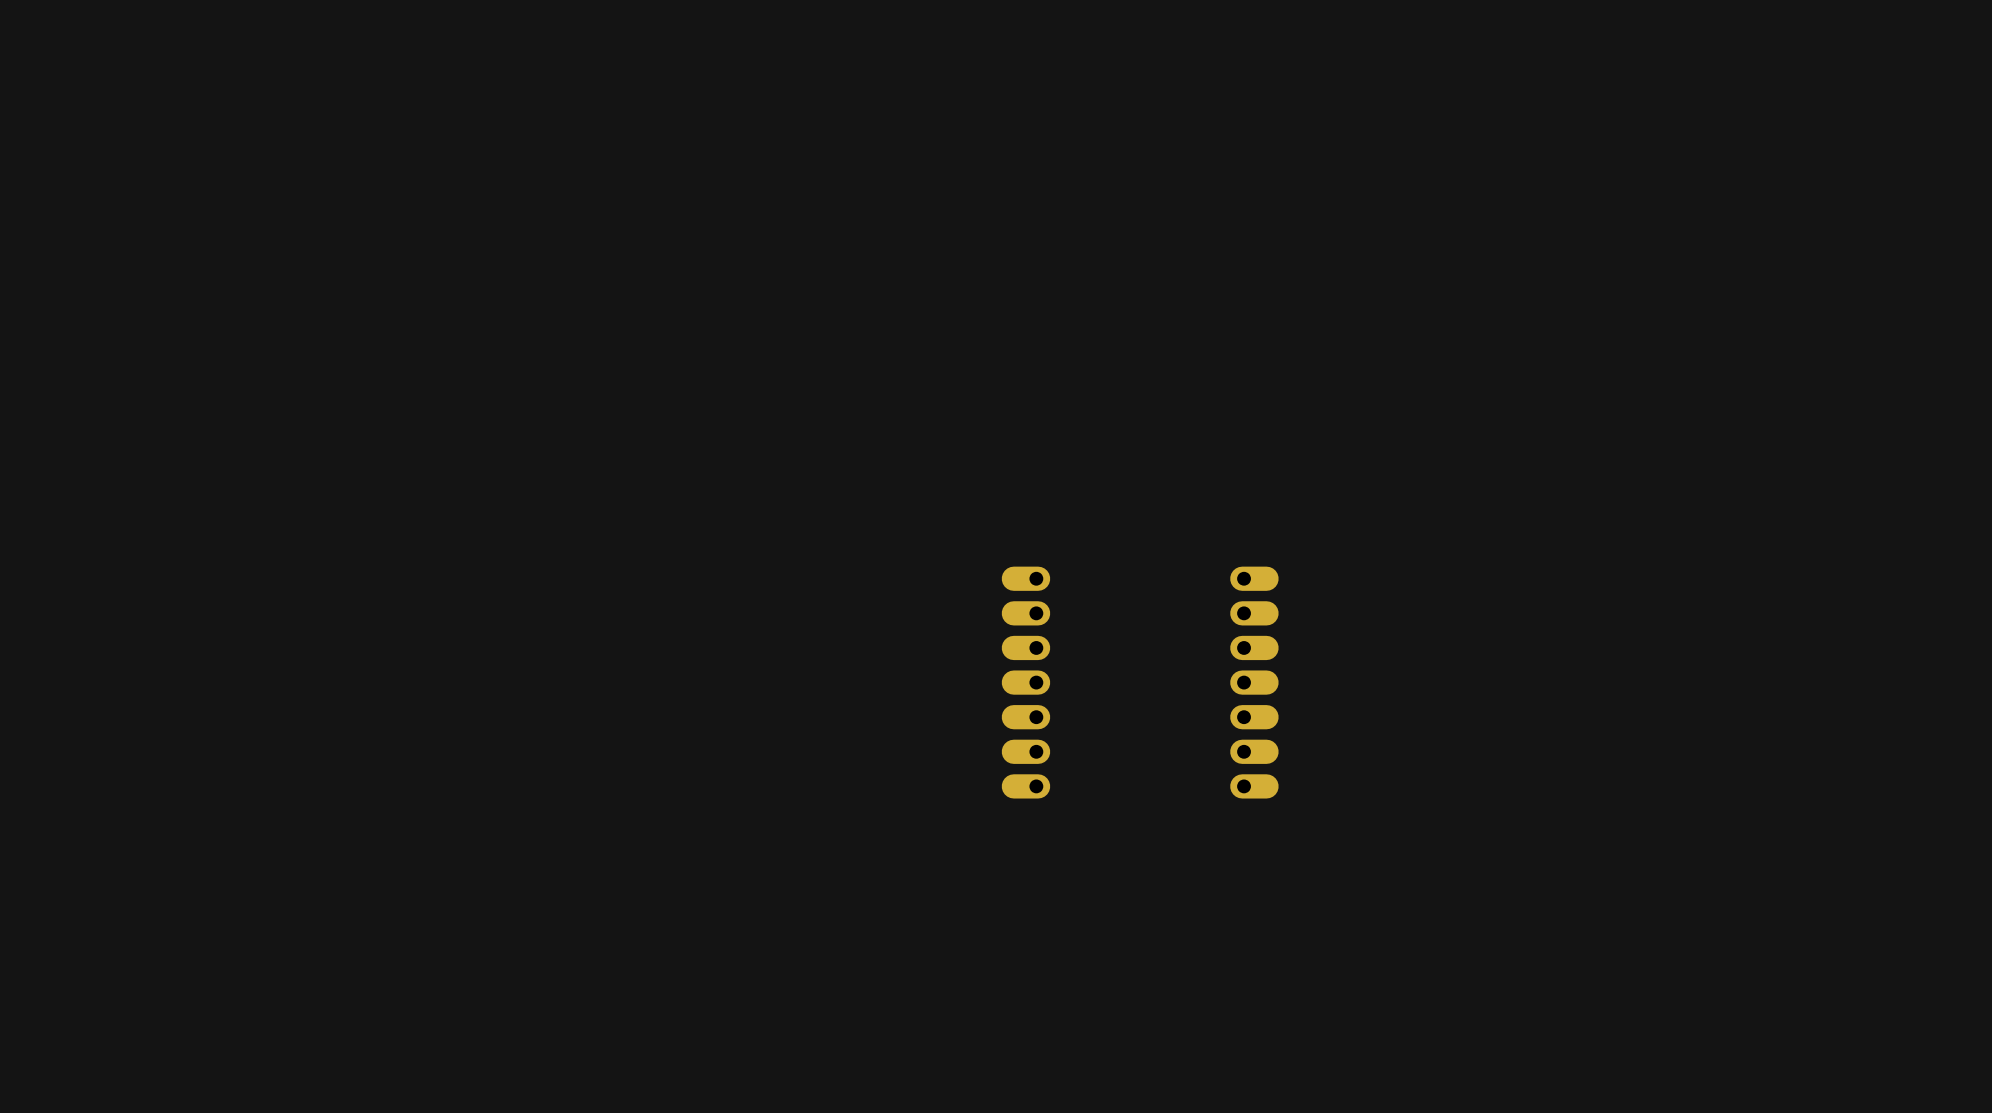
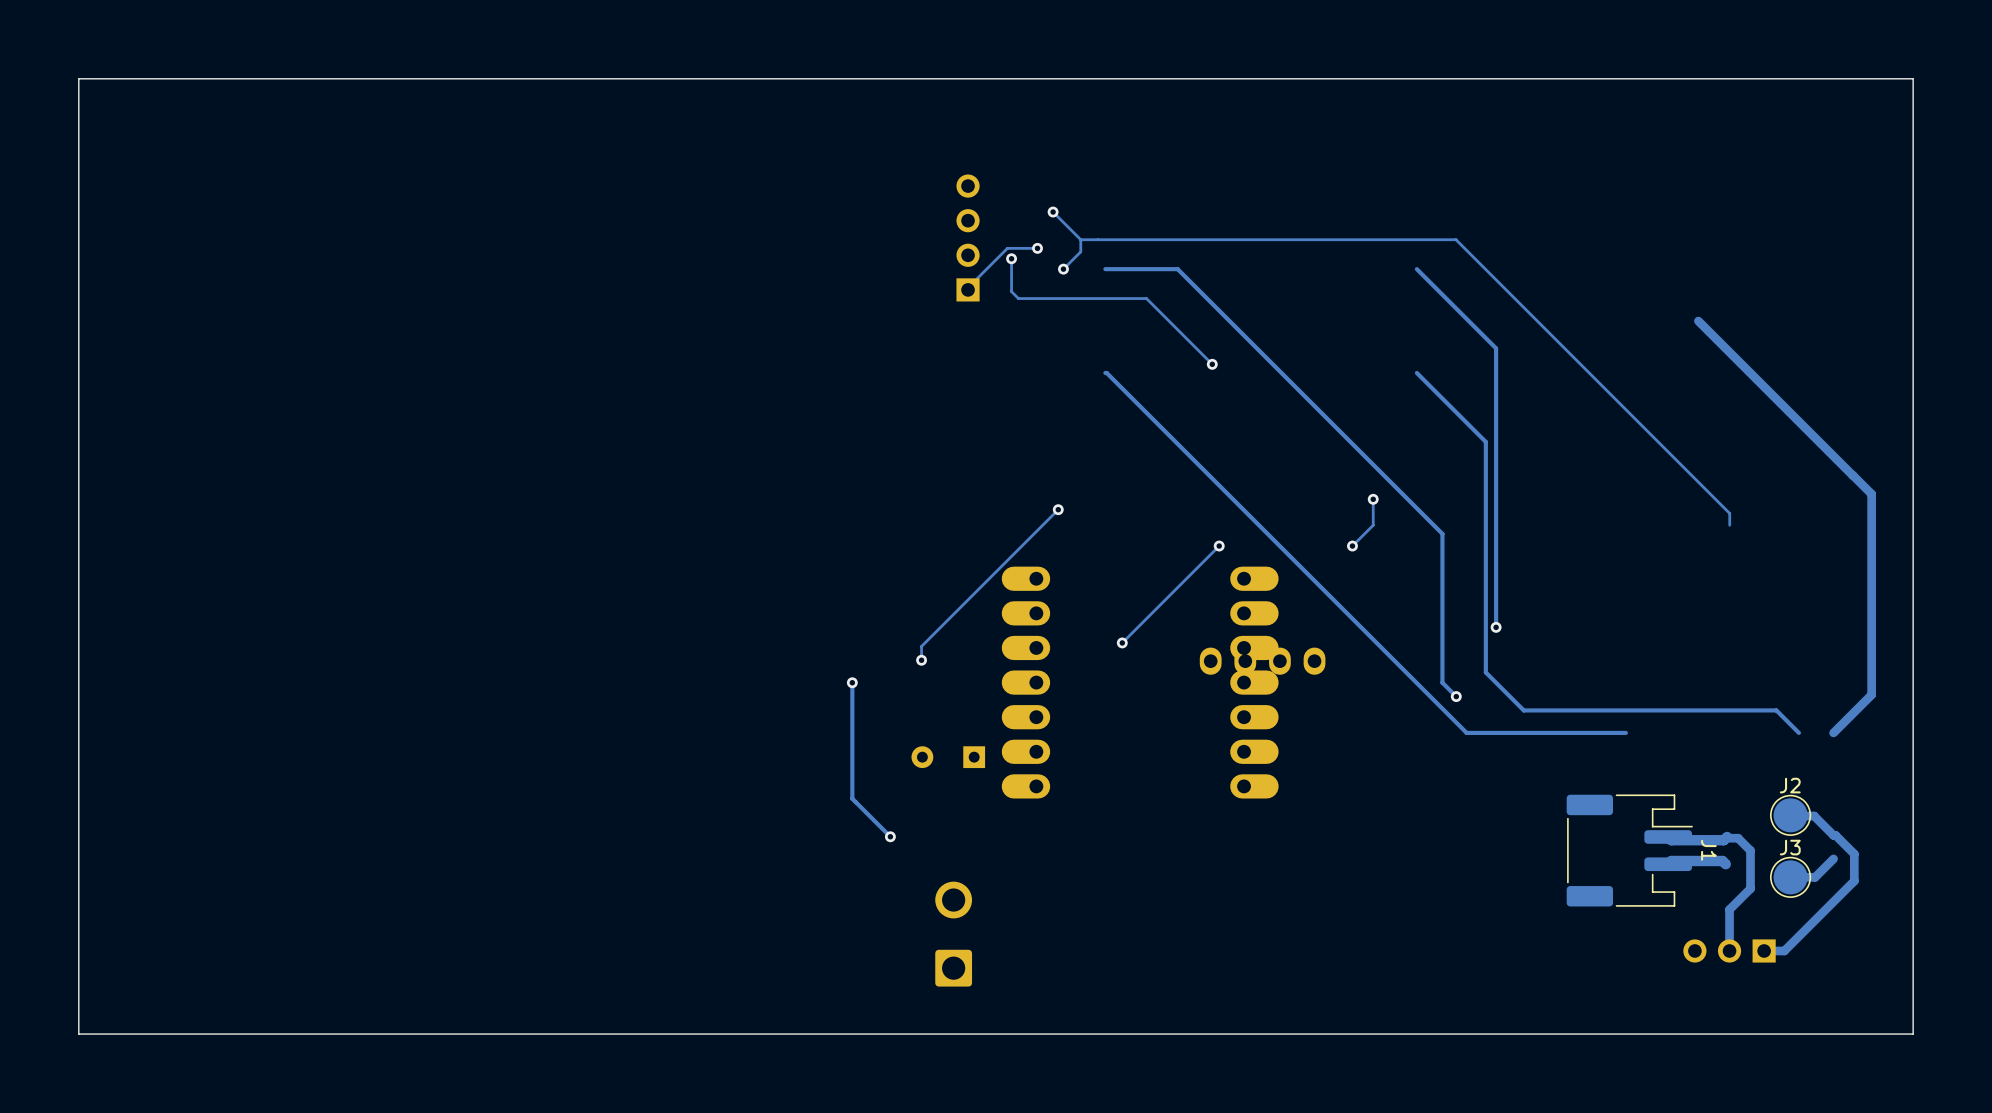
board edge: none -> (1913, 78) (78, 78) (78, 1034) (1913, 1034) (1913, 78)
track: none -> (1053, 212) (1080, 239)
via: none -> (1053, 212)
part: none -> (968, 237)
track: none -> (1080, 239) (1456, 239) (1729, 513) (1729, 525)
track: none -> (1080, 239) (1080, 251) (1063, 269)
track: none -> (1037, 248) (1007, 248) (968, 289)
via: none -> (1037, 248)
track: none -> (1011, 258) (1011, 291) (1018, 298) (1146, 298) (1212, 364)
via: none -> (1011, 258)
via: none -> (1063, 269)
track: none -> (1105, 269) (1177, 269) (1442, 533) (1442, 682) (1456, 696)
track: none -> (1416, 269) (1496, 348) (1496, 627)
track: none -> (1698, 321) (1852, 475)
via: none -> (1212, 364)
track: none -> (1105, 372) (1466, 732) (1625, 732)
track: none -> (1416, 372) (1485, 441) (1485, 672) (1523, 710) (1776, 710) (1798, 732)
track: none -> (1852, 475) (1871, 494) (1871, 694) (1833, 732)
track: none -> (1373, 499) (1373, 525) (1352, 546)
via: none -> (1373, 499)
track: none -> (1058, 509) (921, 646) (921, 660)
via: none -> (1058, 509)
track: none -> (1219, 546) (1122, 642)
via: none -> (1219, 546)
via: none -> (1352, 546)
via: none -> (1496, 627)
via: none -> (1122, 642)
via: none -> (921, 660)
part: none -> (1262, 661)
track: none -> (852, 682) (852, 798) (890, 836)
via: none -> (852, 682)
via: none -> (1456, 696)
part: none -> (948, 757)
track: none -> (1790, 815) (1814, 816) (1854, 854) (1854, 881) (1784, 950) (1764, 950)
J2: none -> (1790, 815)
via: none -> (890, 836)
track: none -> (1668, 836) (1671, 840) (1723, 840) (1727, 836) (1738, 838) (1750, 850) (1750, 888) (1729, 909) (1729, 950)
J1: none -> (1629, 850)
track: none -> (1833, 858) (1815, 877) (1790, 877)
track: none -> (1728, 861) (1725, 864) (1722, 860) (1671, 860) (1668, 864)
J3: none -> (1790, 877)
part: none -> (953, 934)
part: none -> (1729, 950)

